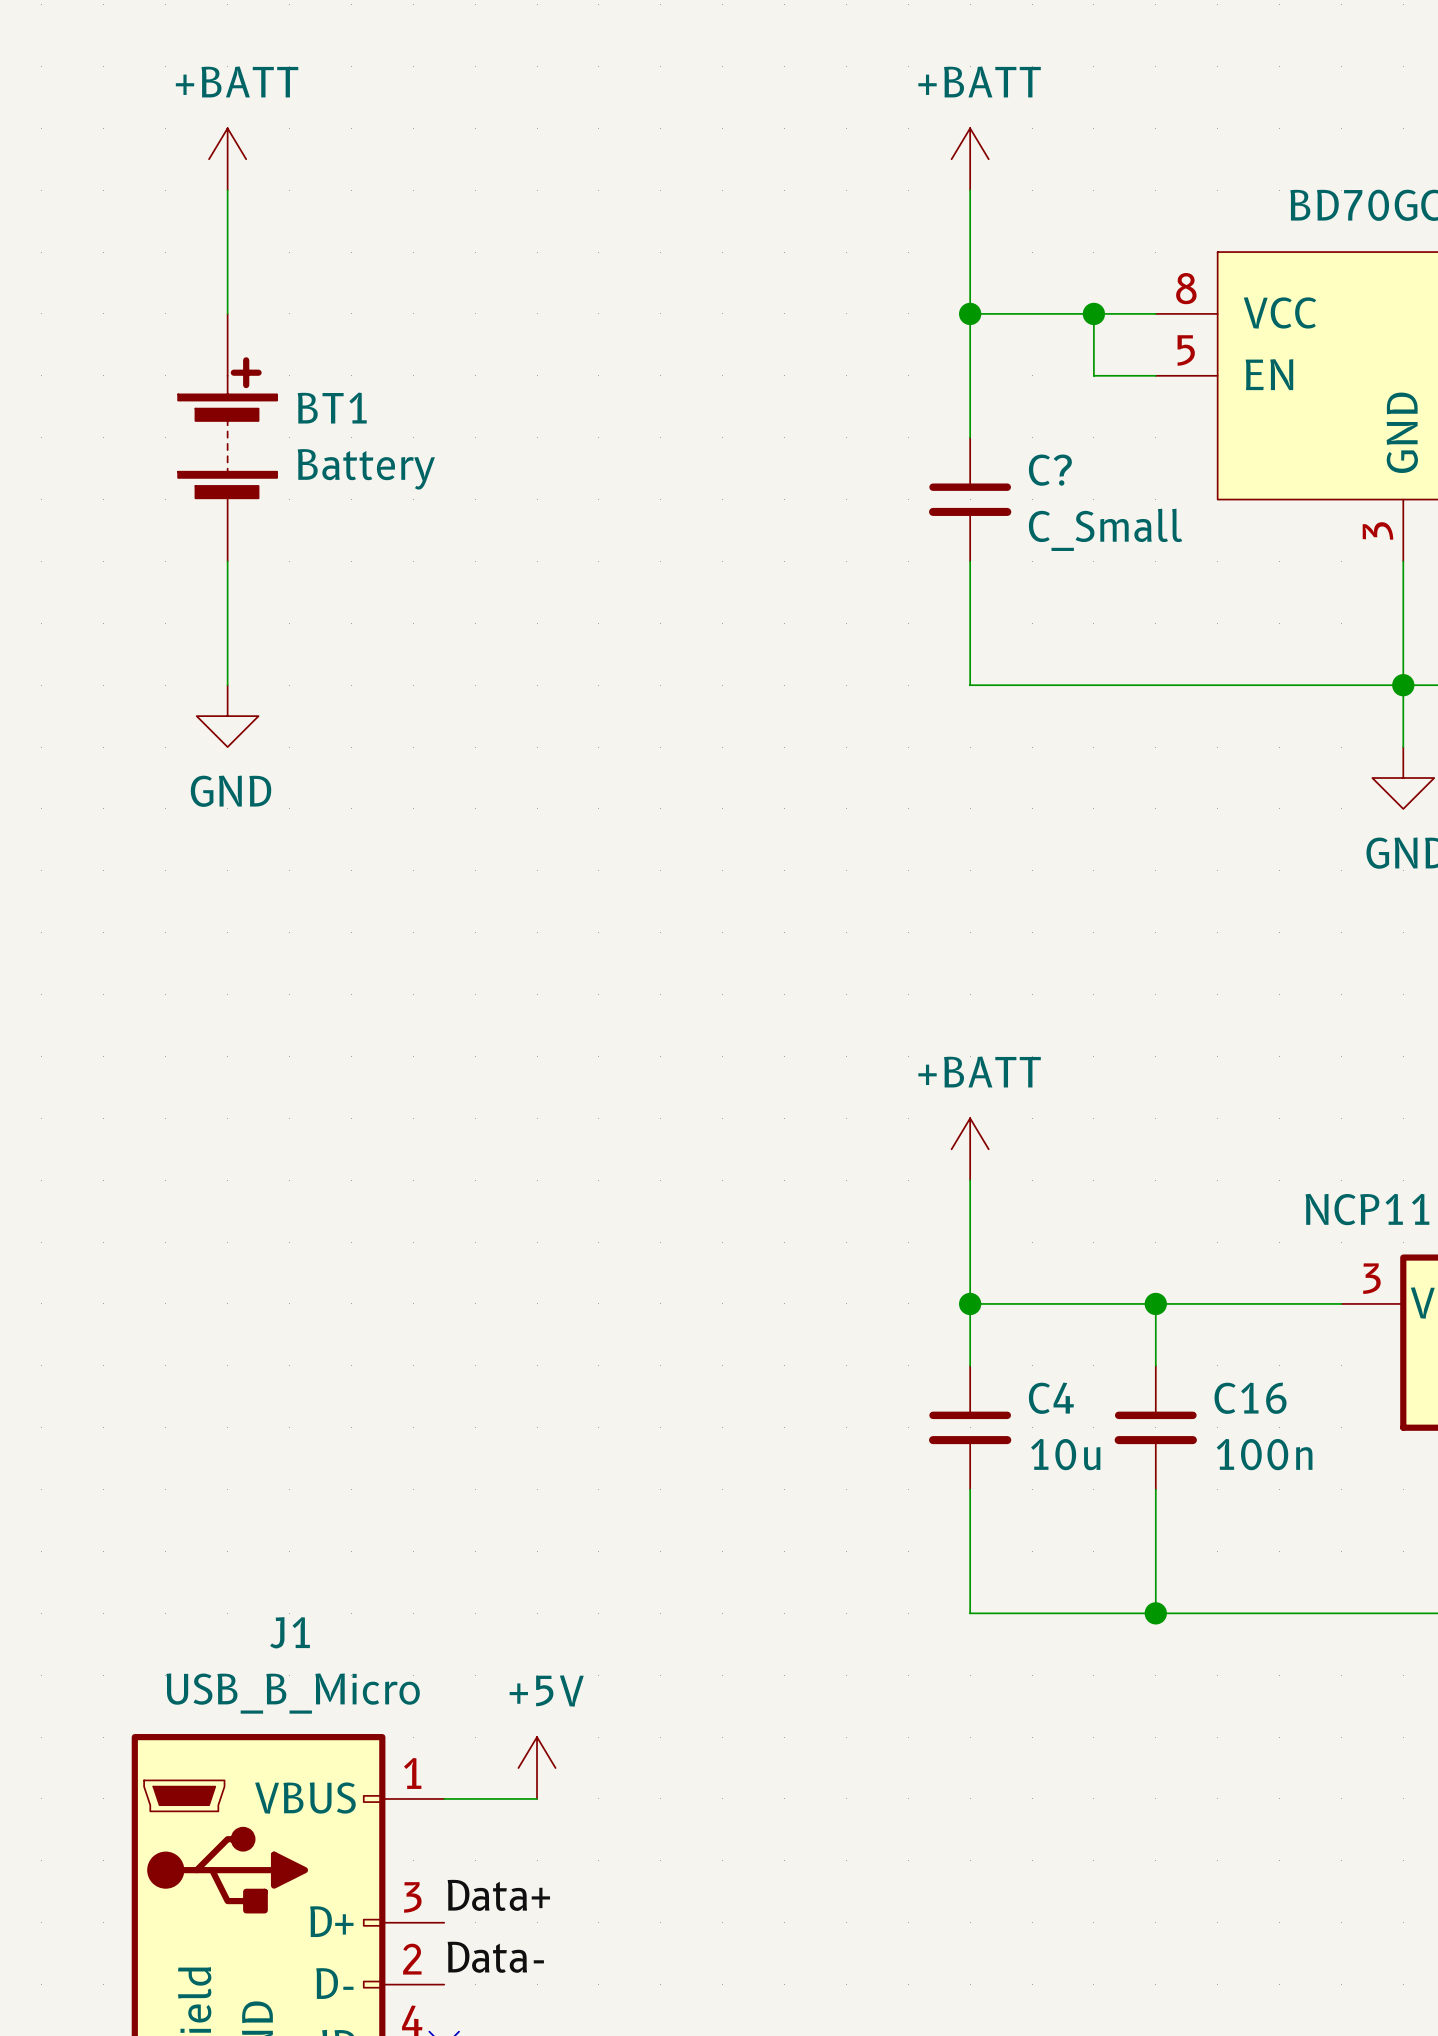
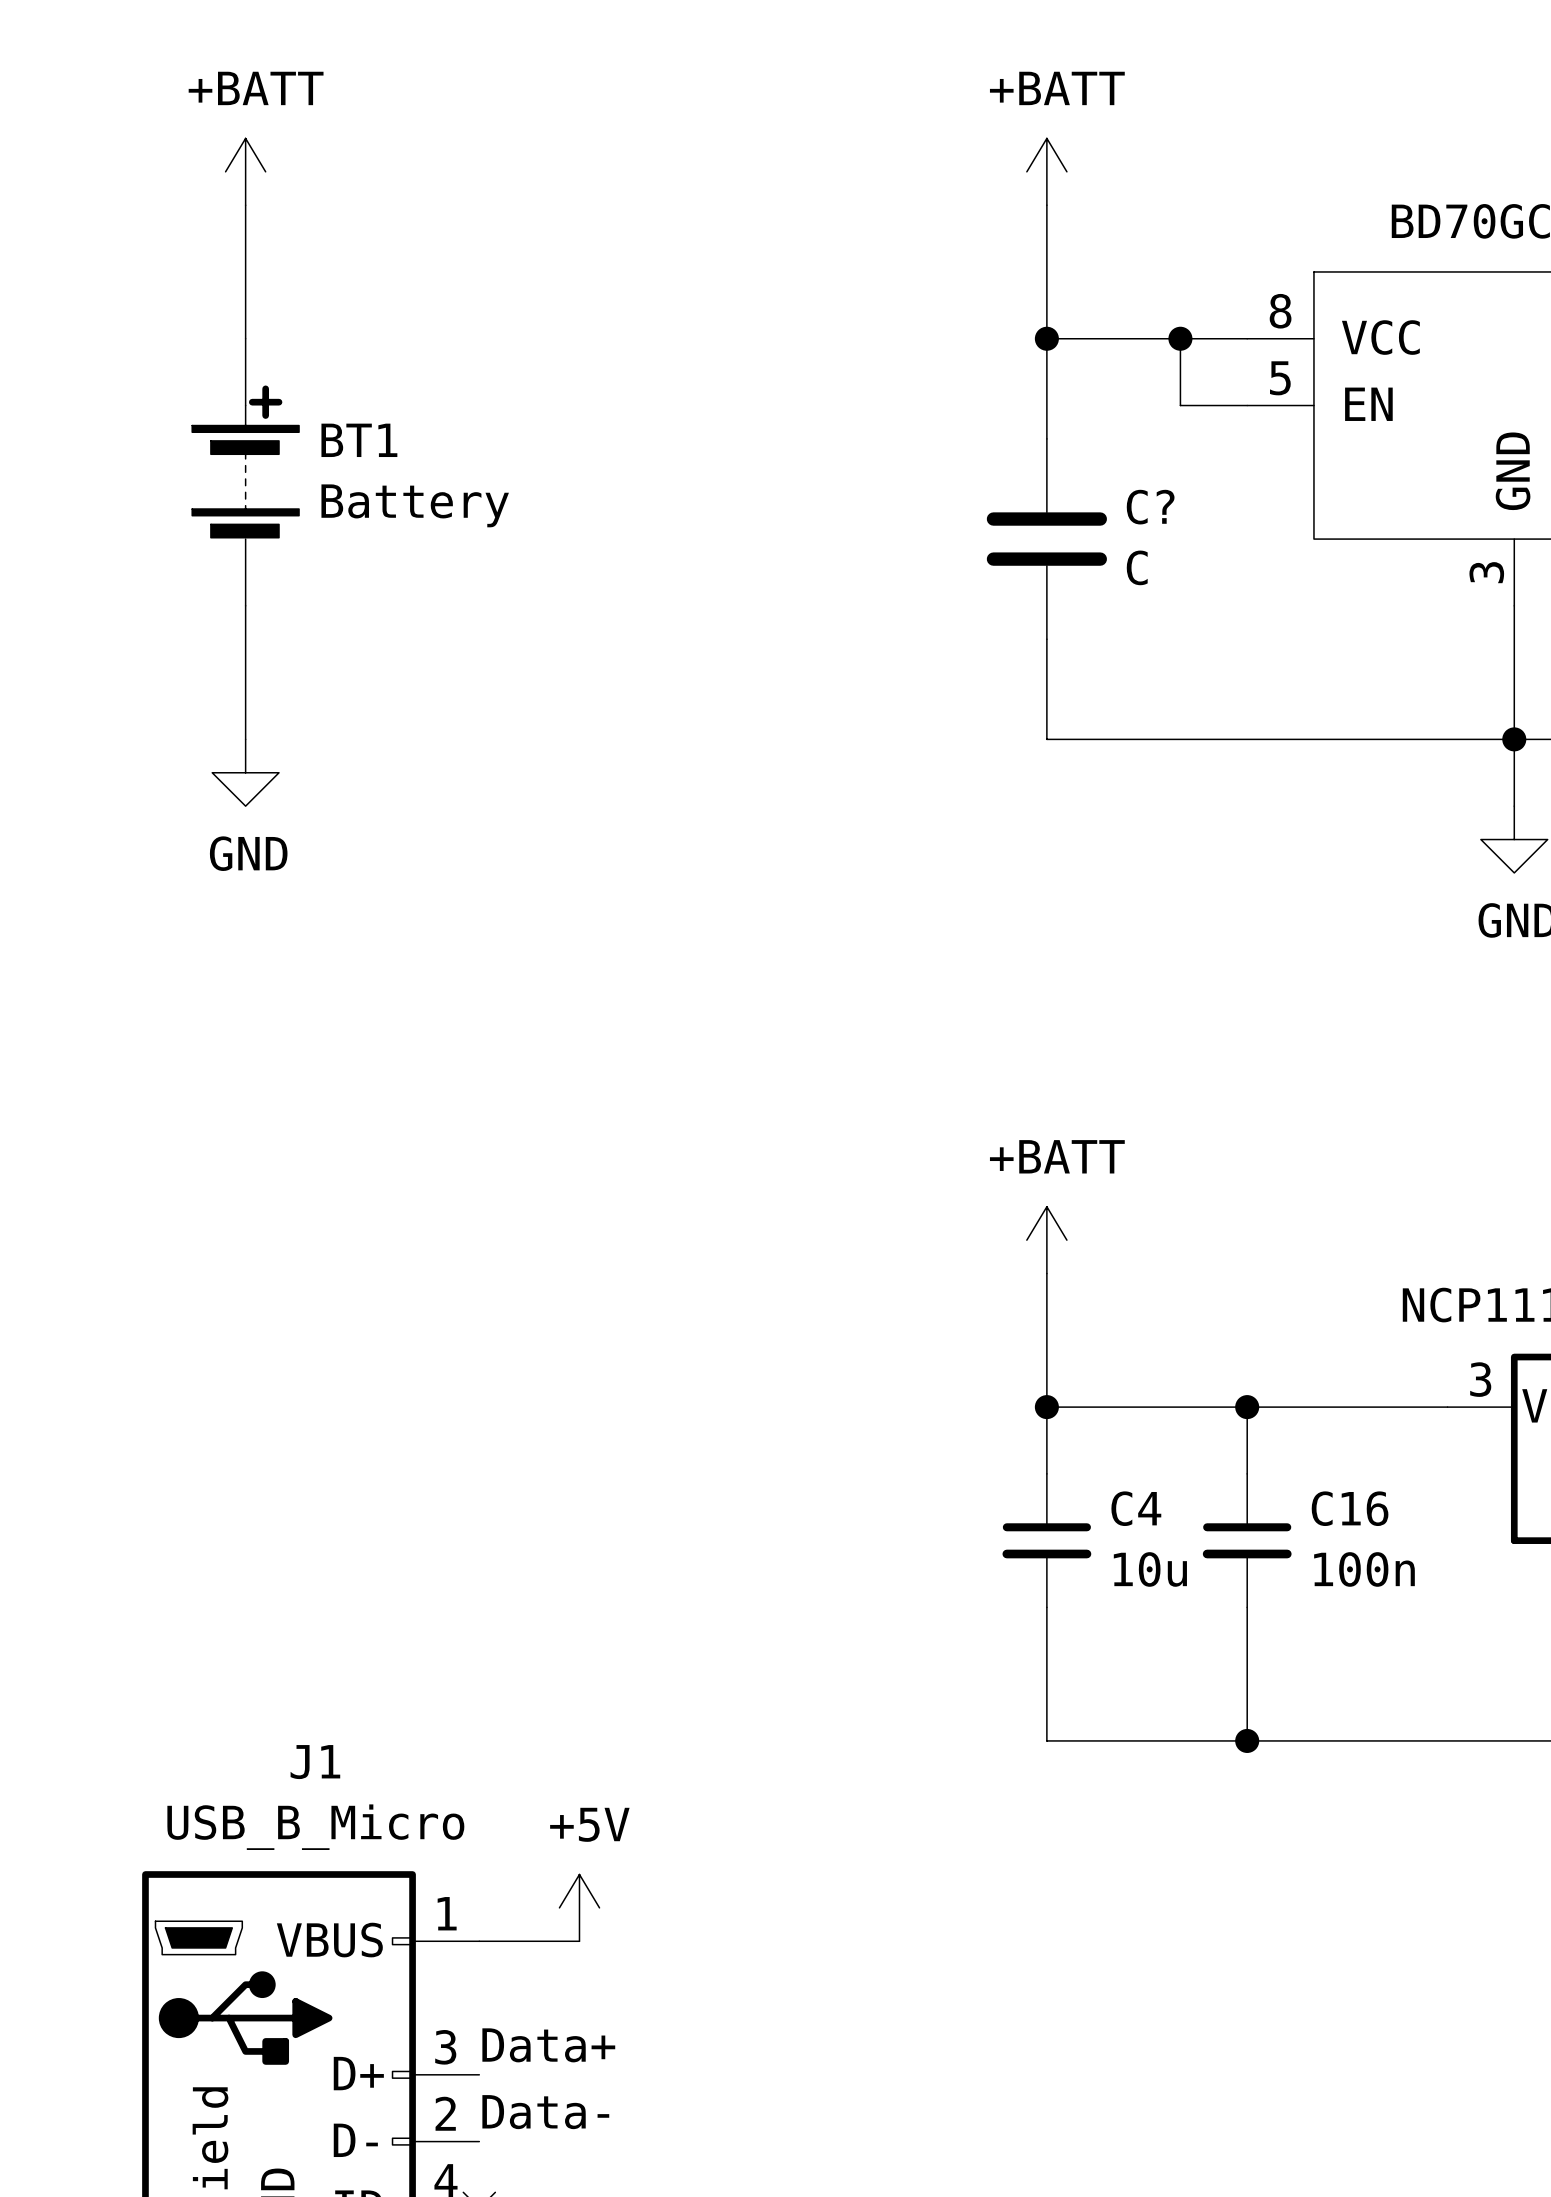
C? symbol: [929, 437, 1012, 562] -> [986, 438, 1107, 640]
C? value: C_Small (1105, 529) -> C (1137, 567)

